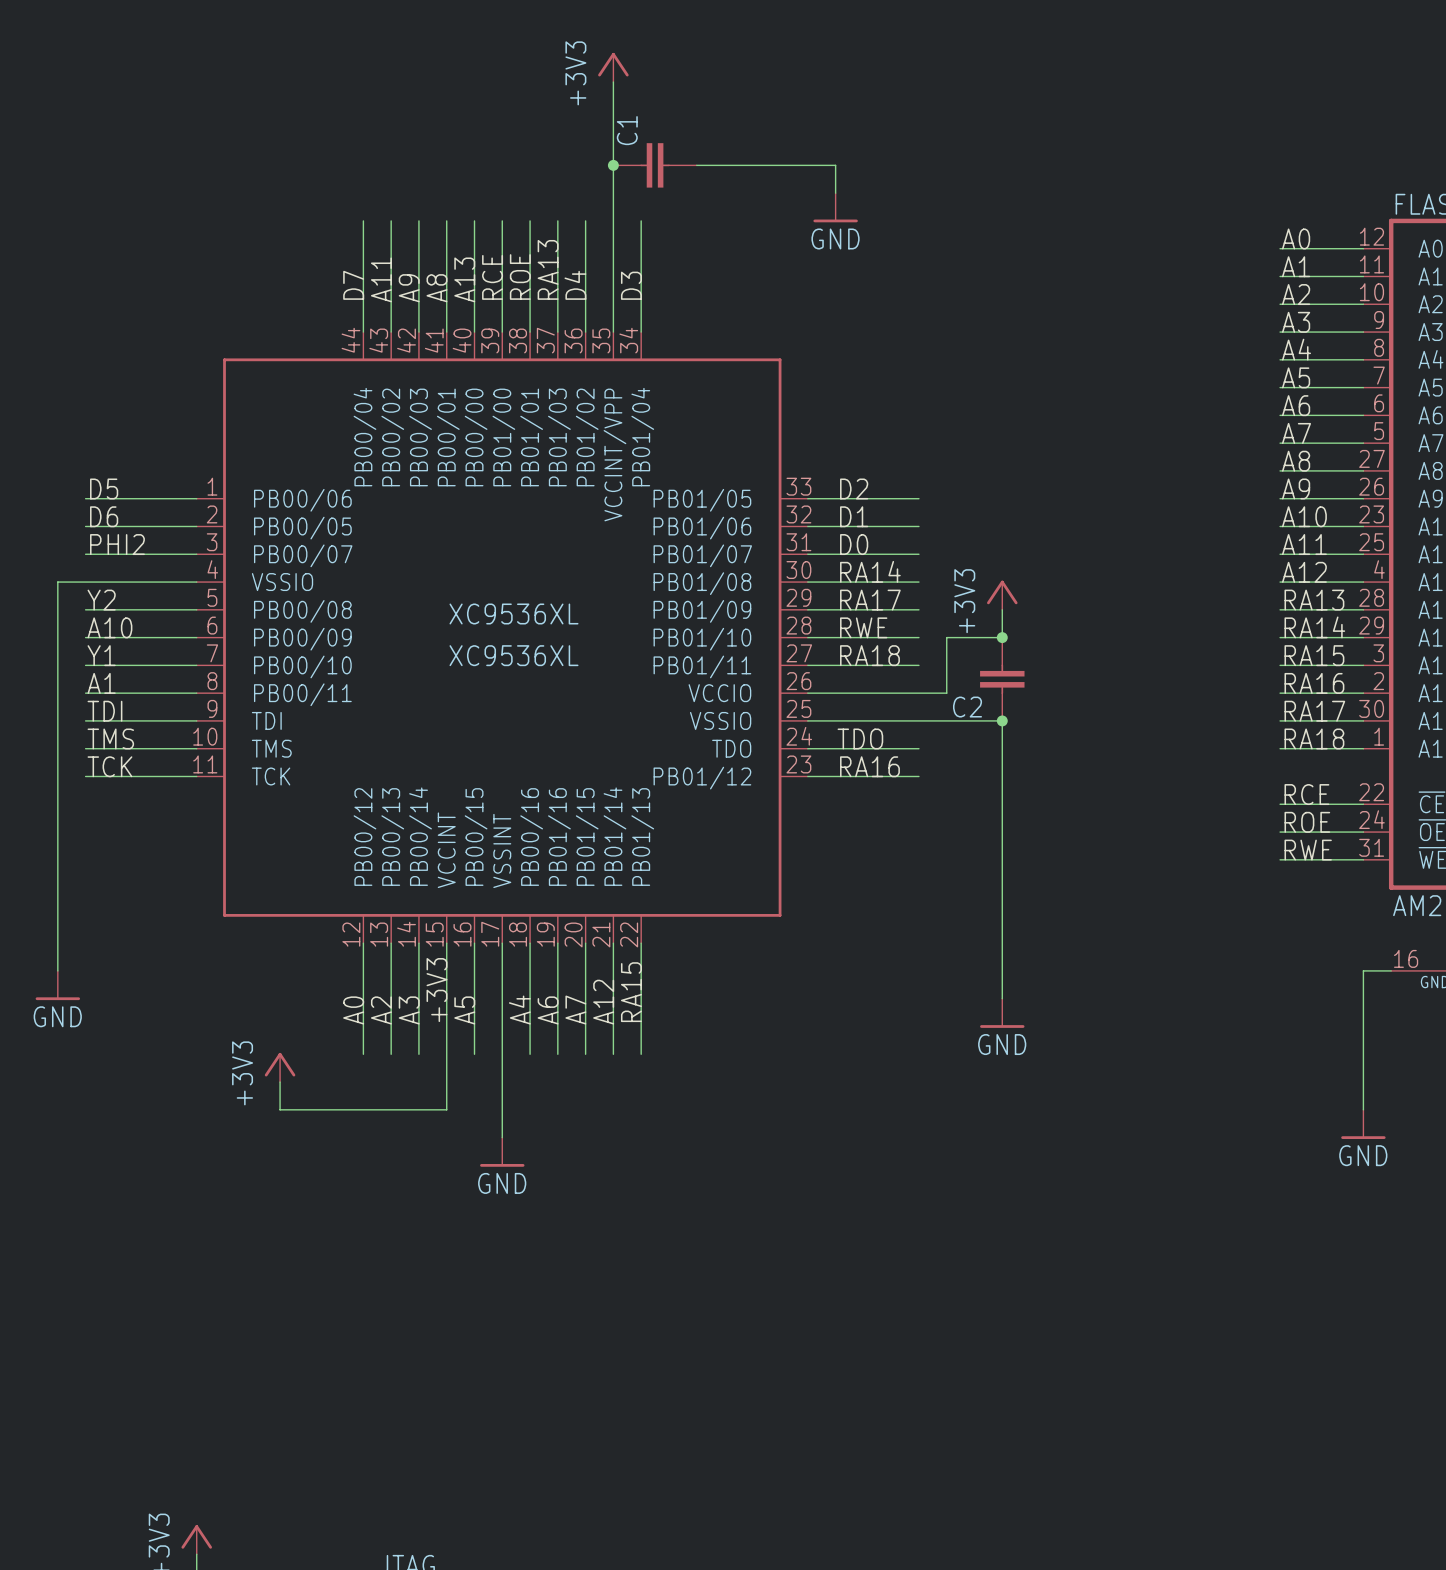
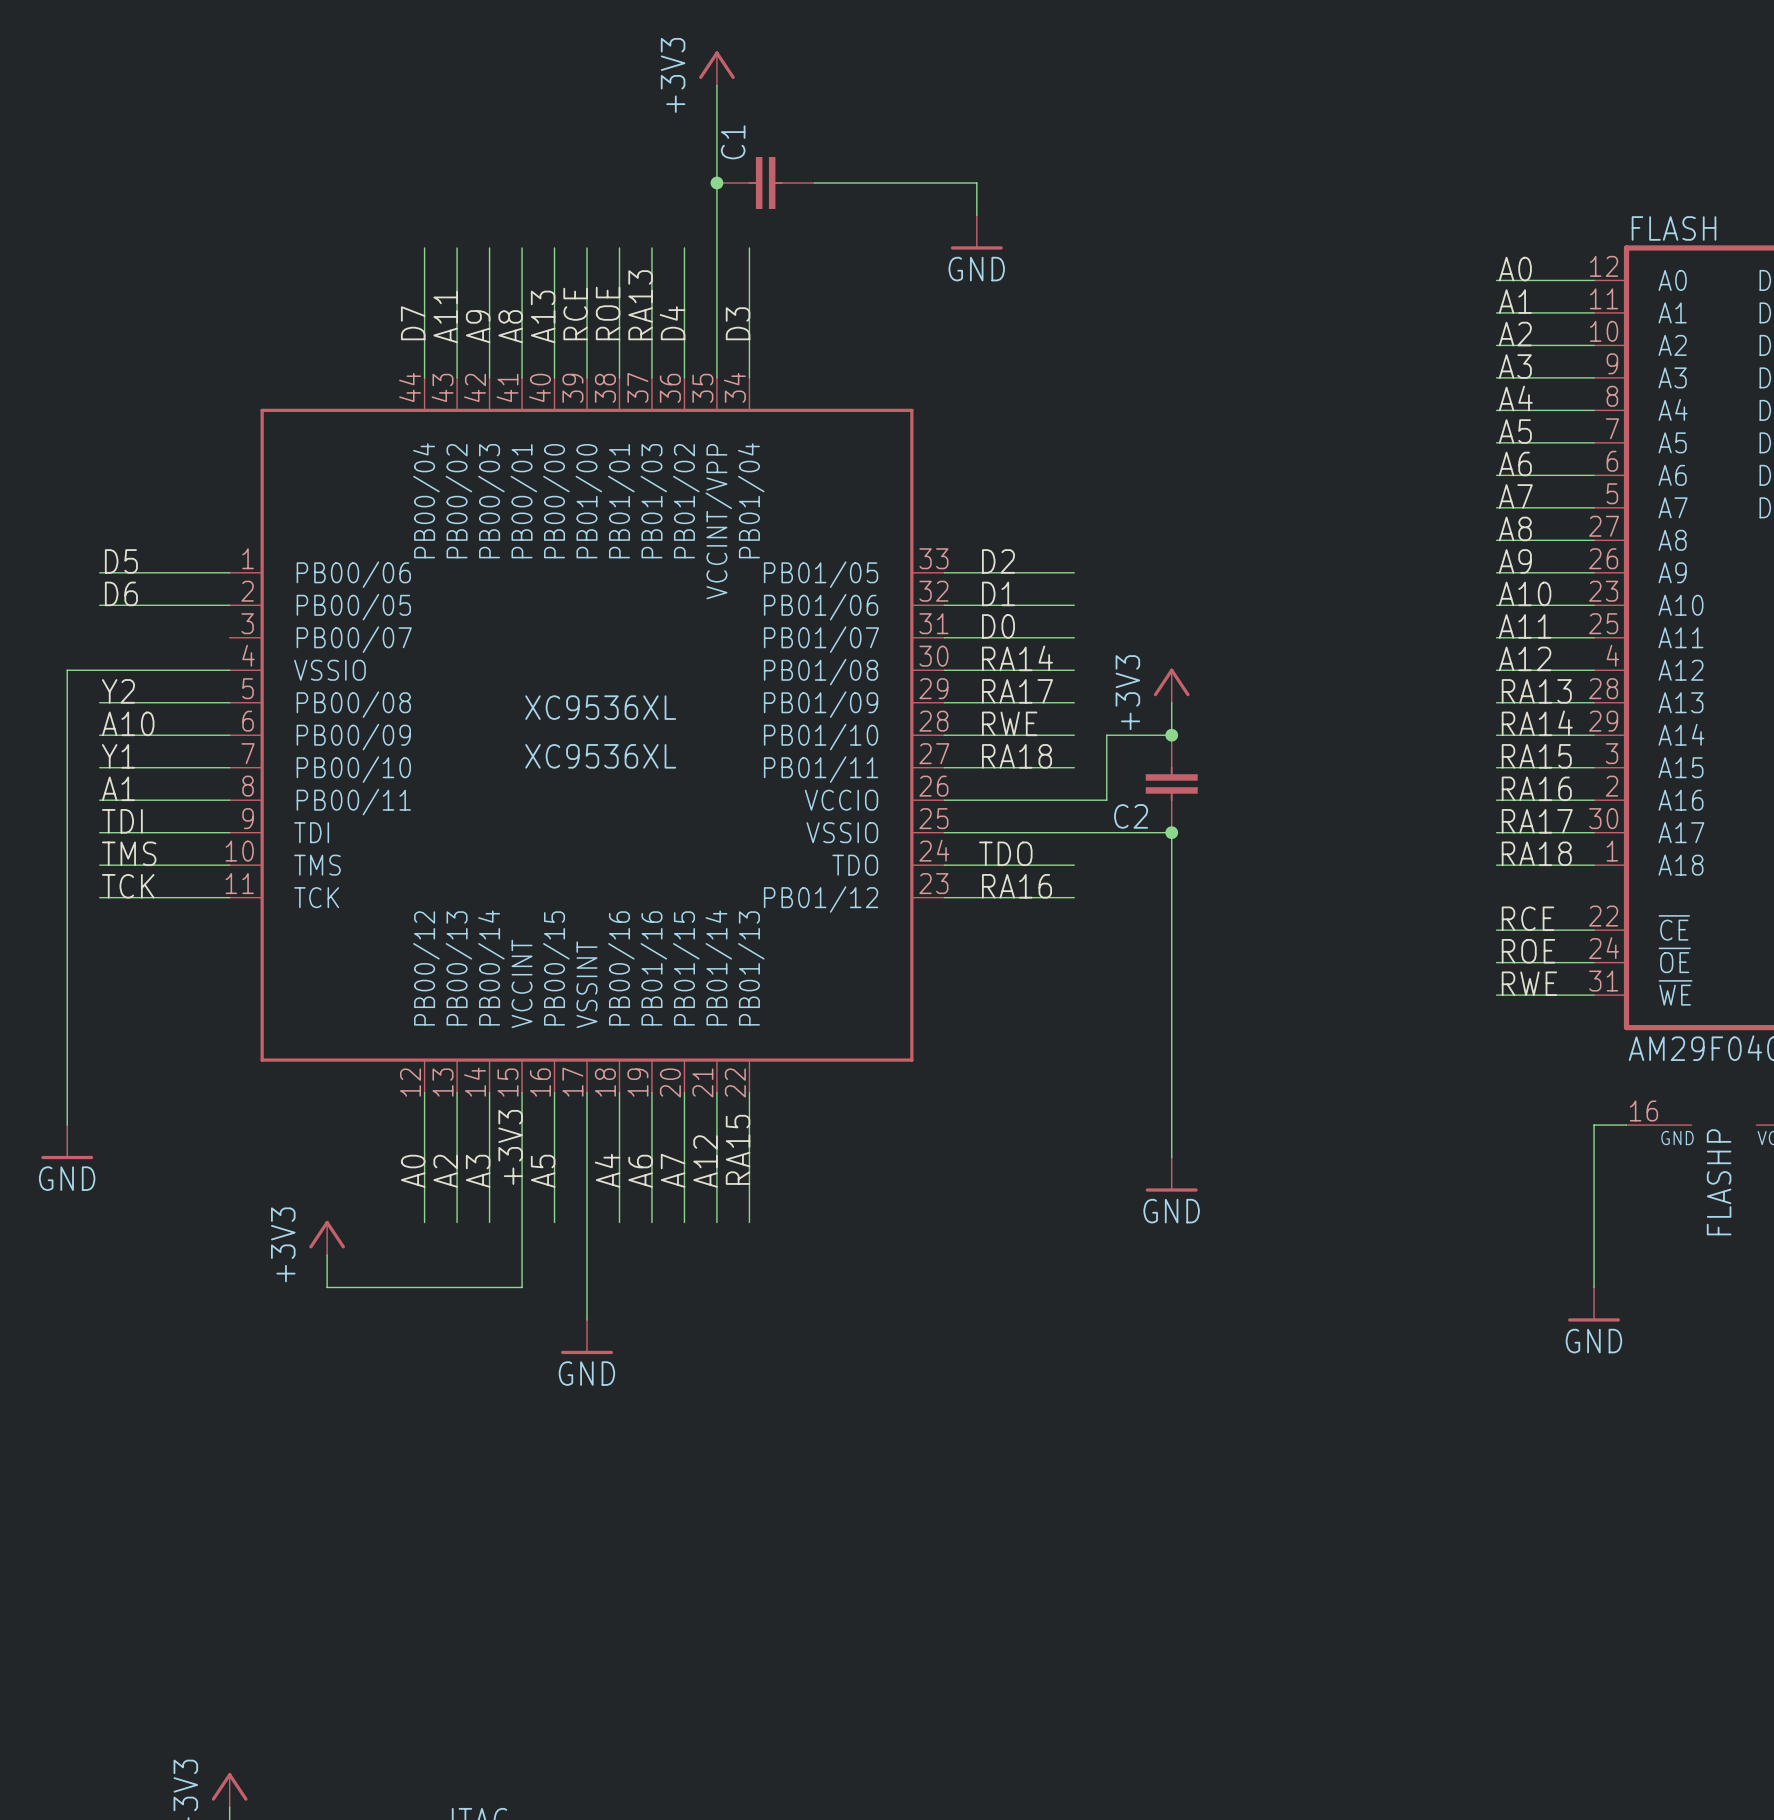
label: PHI2 (117, 544) -> none
wire: (85, 554) (196, 554) -> none

